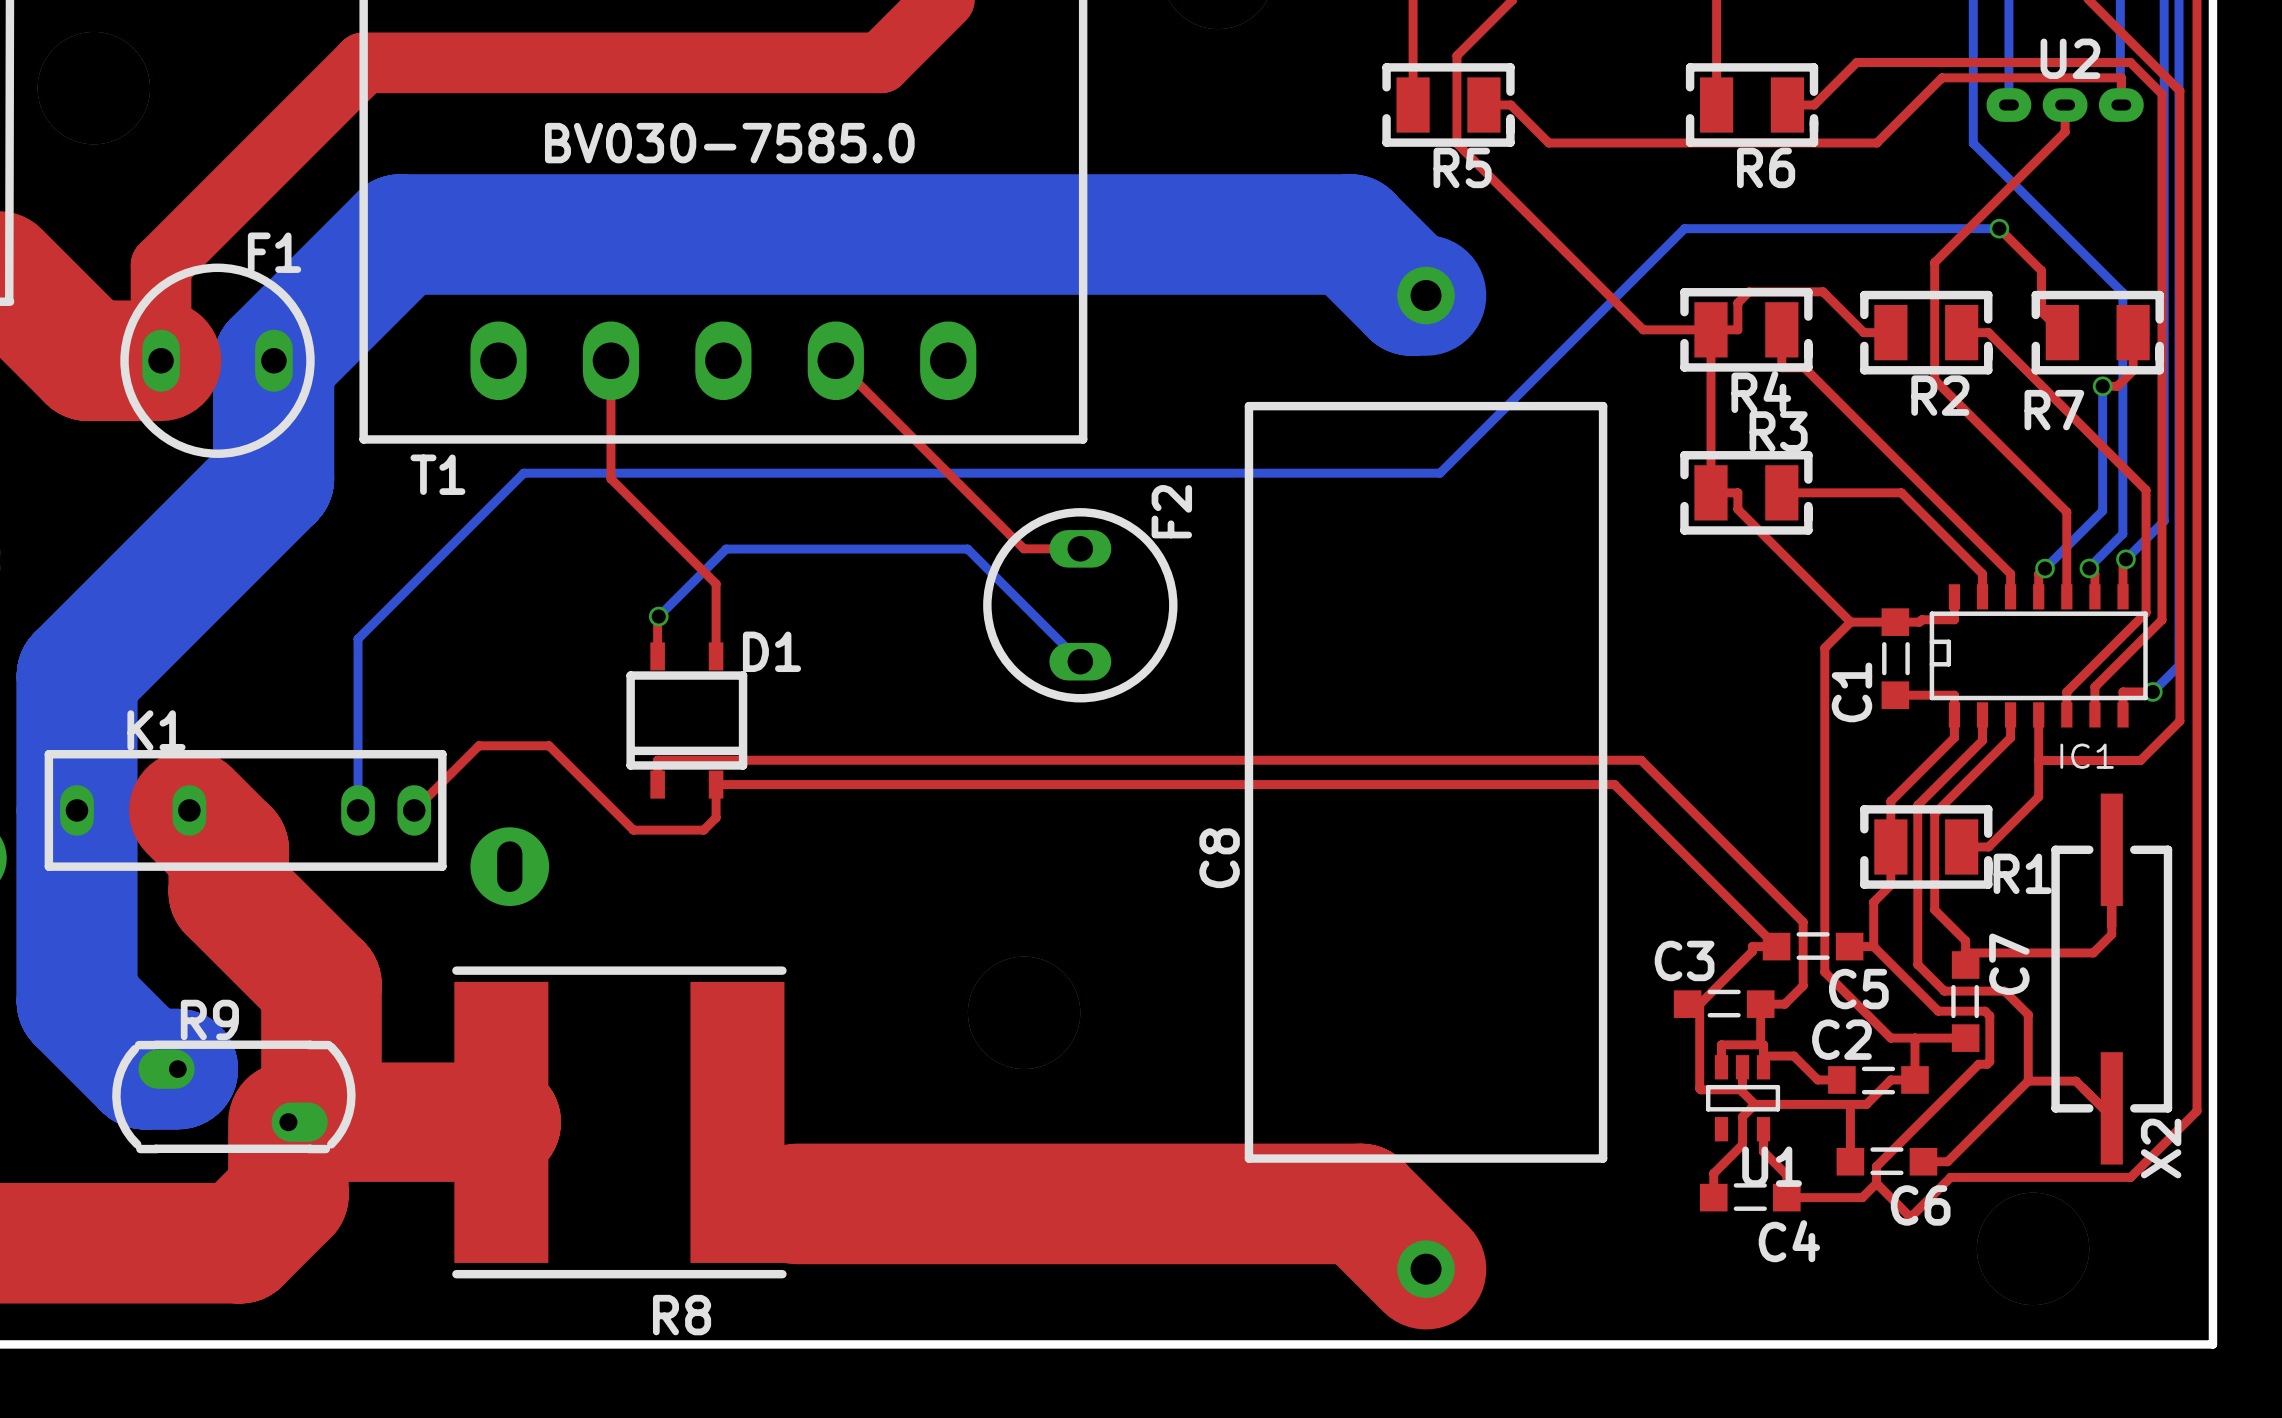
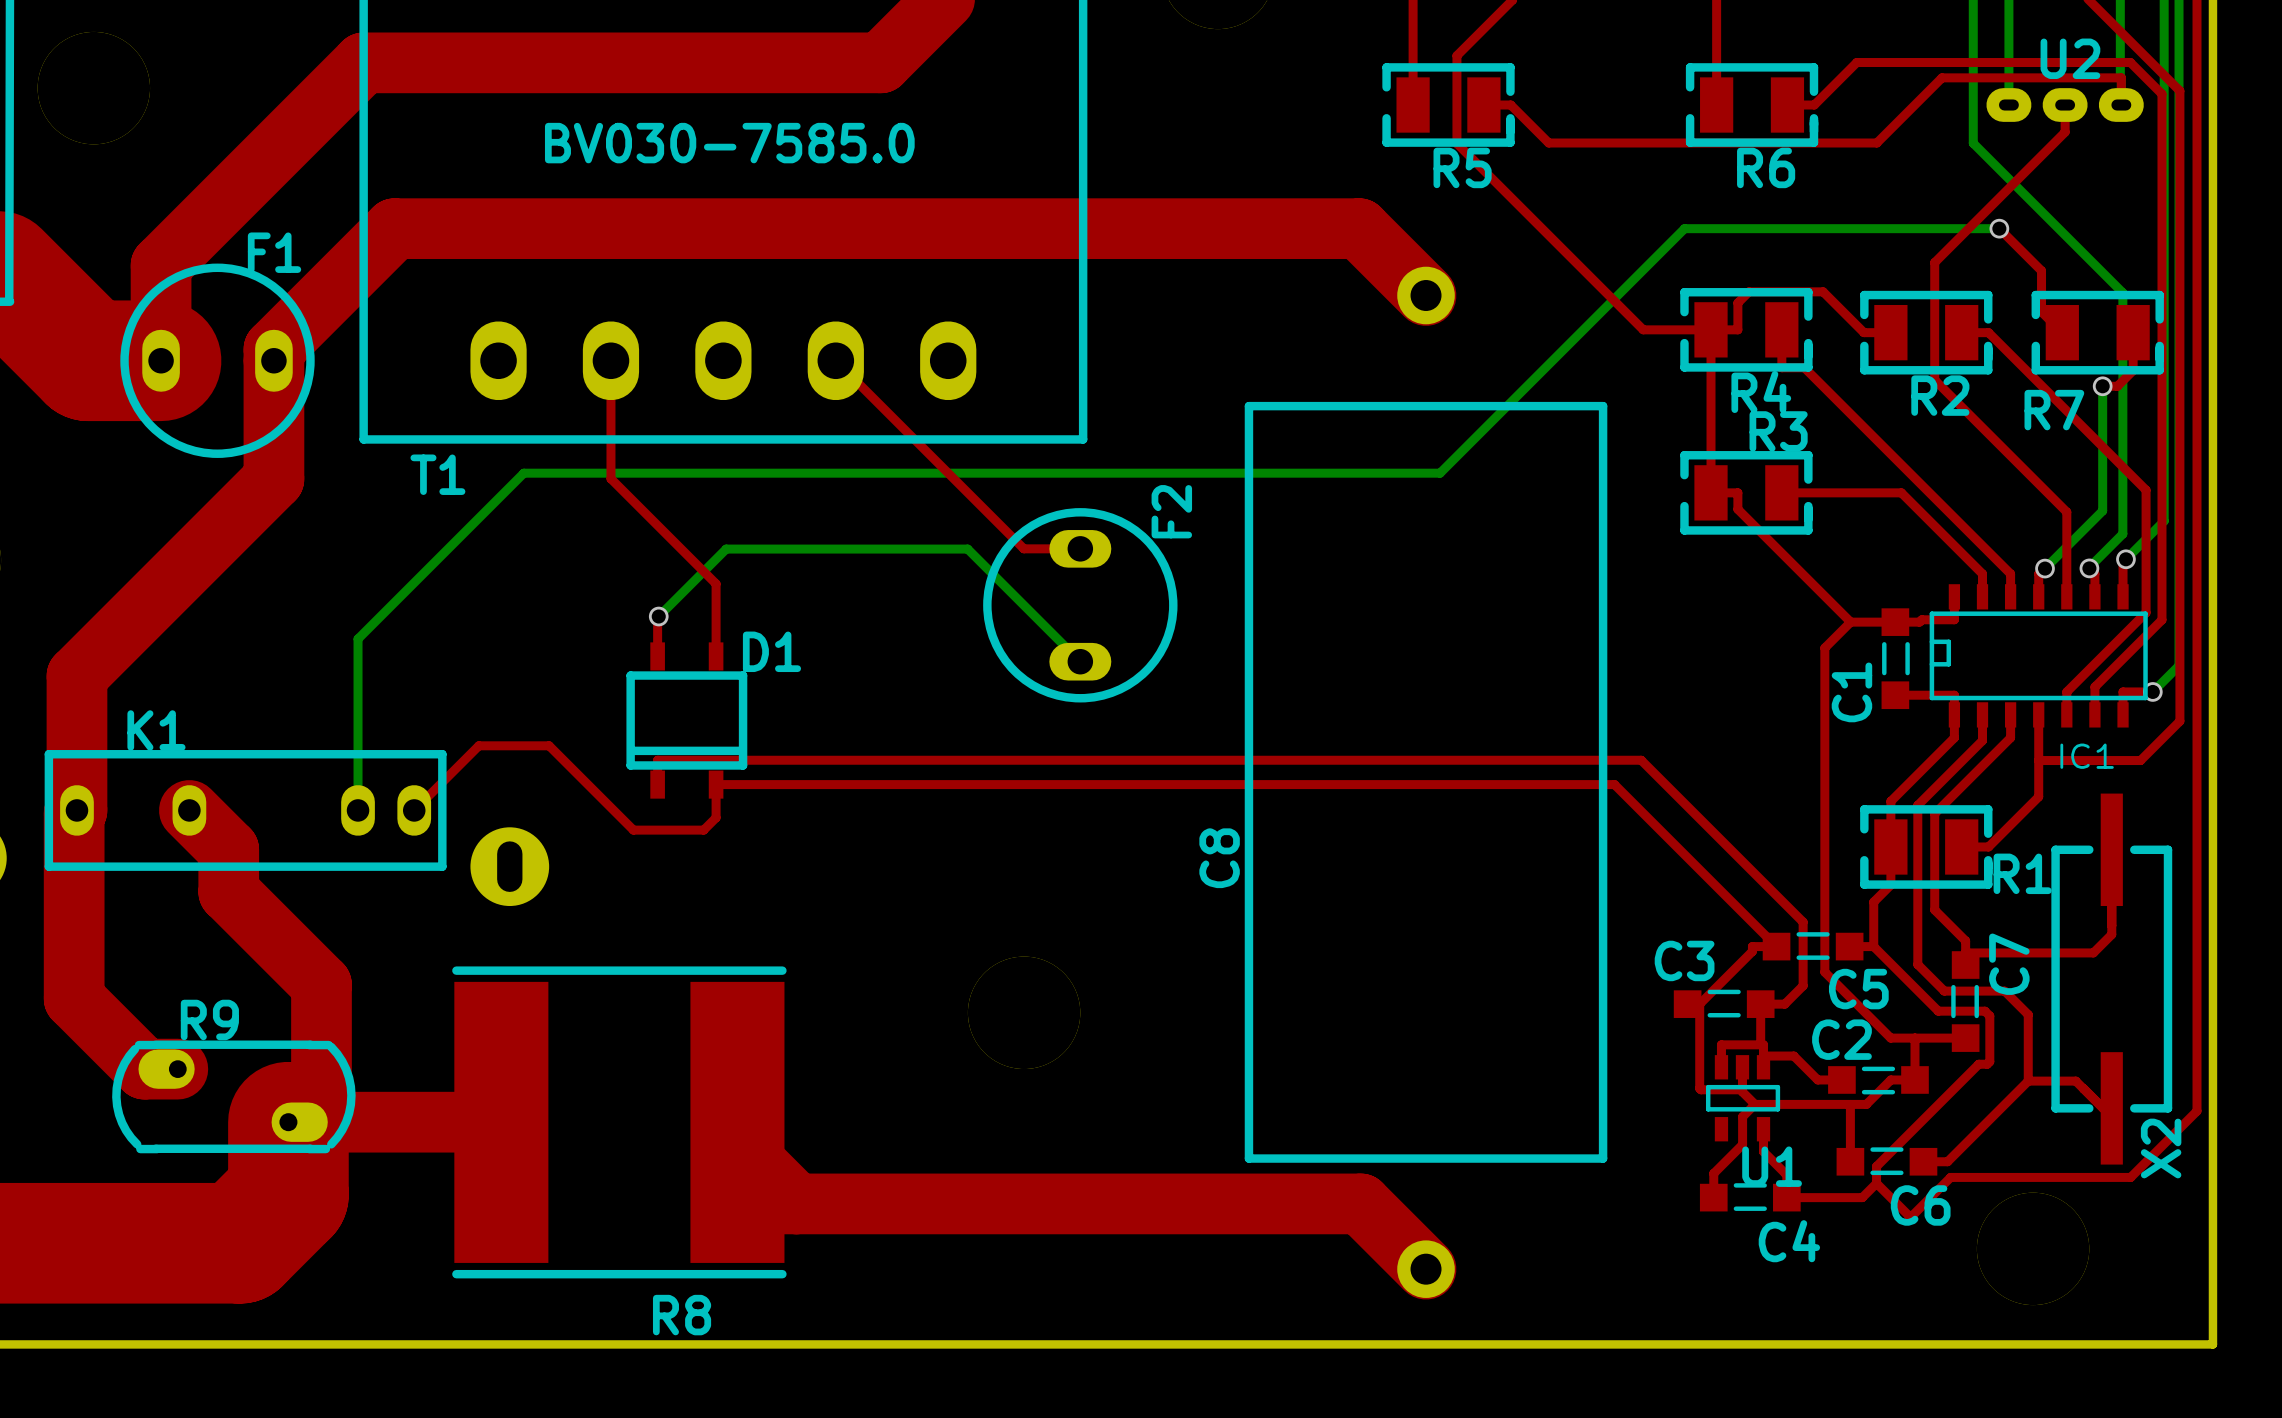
top track: none -> (1426, 295) (1359, 228) (394, 228) (273, 349) (273, 479) (76, 675) (76, 810) (74, 813) (74, 998) (144, 1069) (177, 1069)
bottom track: (1426, 295) (1411, 295) (1350, 234) (400, 234) (273, 360) (273, 478) -> none
bottom track: (273, 360) (273, 478) (76, 675) (76, 1001) (144, 1069) (177, 1069) -> none
top track width: thick (189, 810) (228, 849) (228, 891) (321, 984) (321, 1094) (293, 1122) (501, 1122) -> thin (189, 810) (228, 849) (228, 891) (321, 984) (321, 1094) (293, 1122) (501, 1122)
top track width: thick (796, 1203) (1360, 1203) (1426, 1269) -> thin (796, 1203) (1360, 1203) (1426, 1269)

